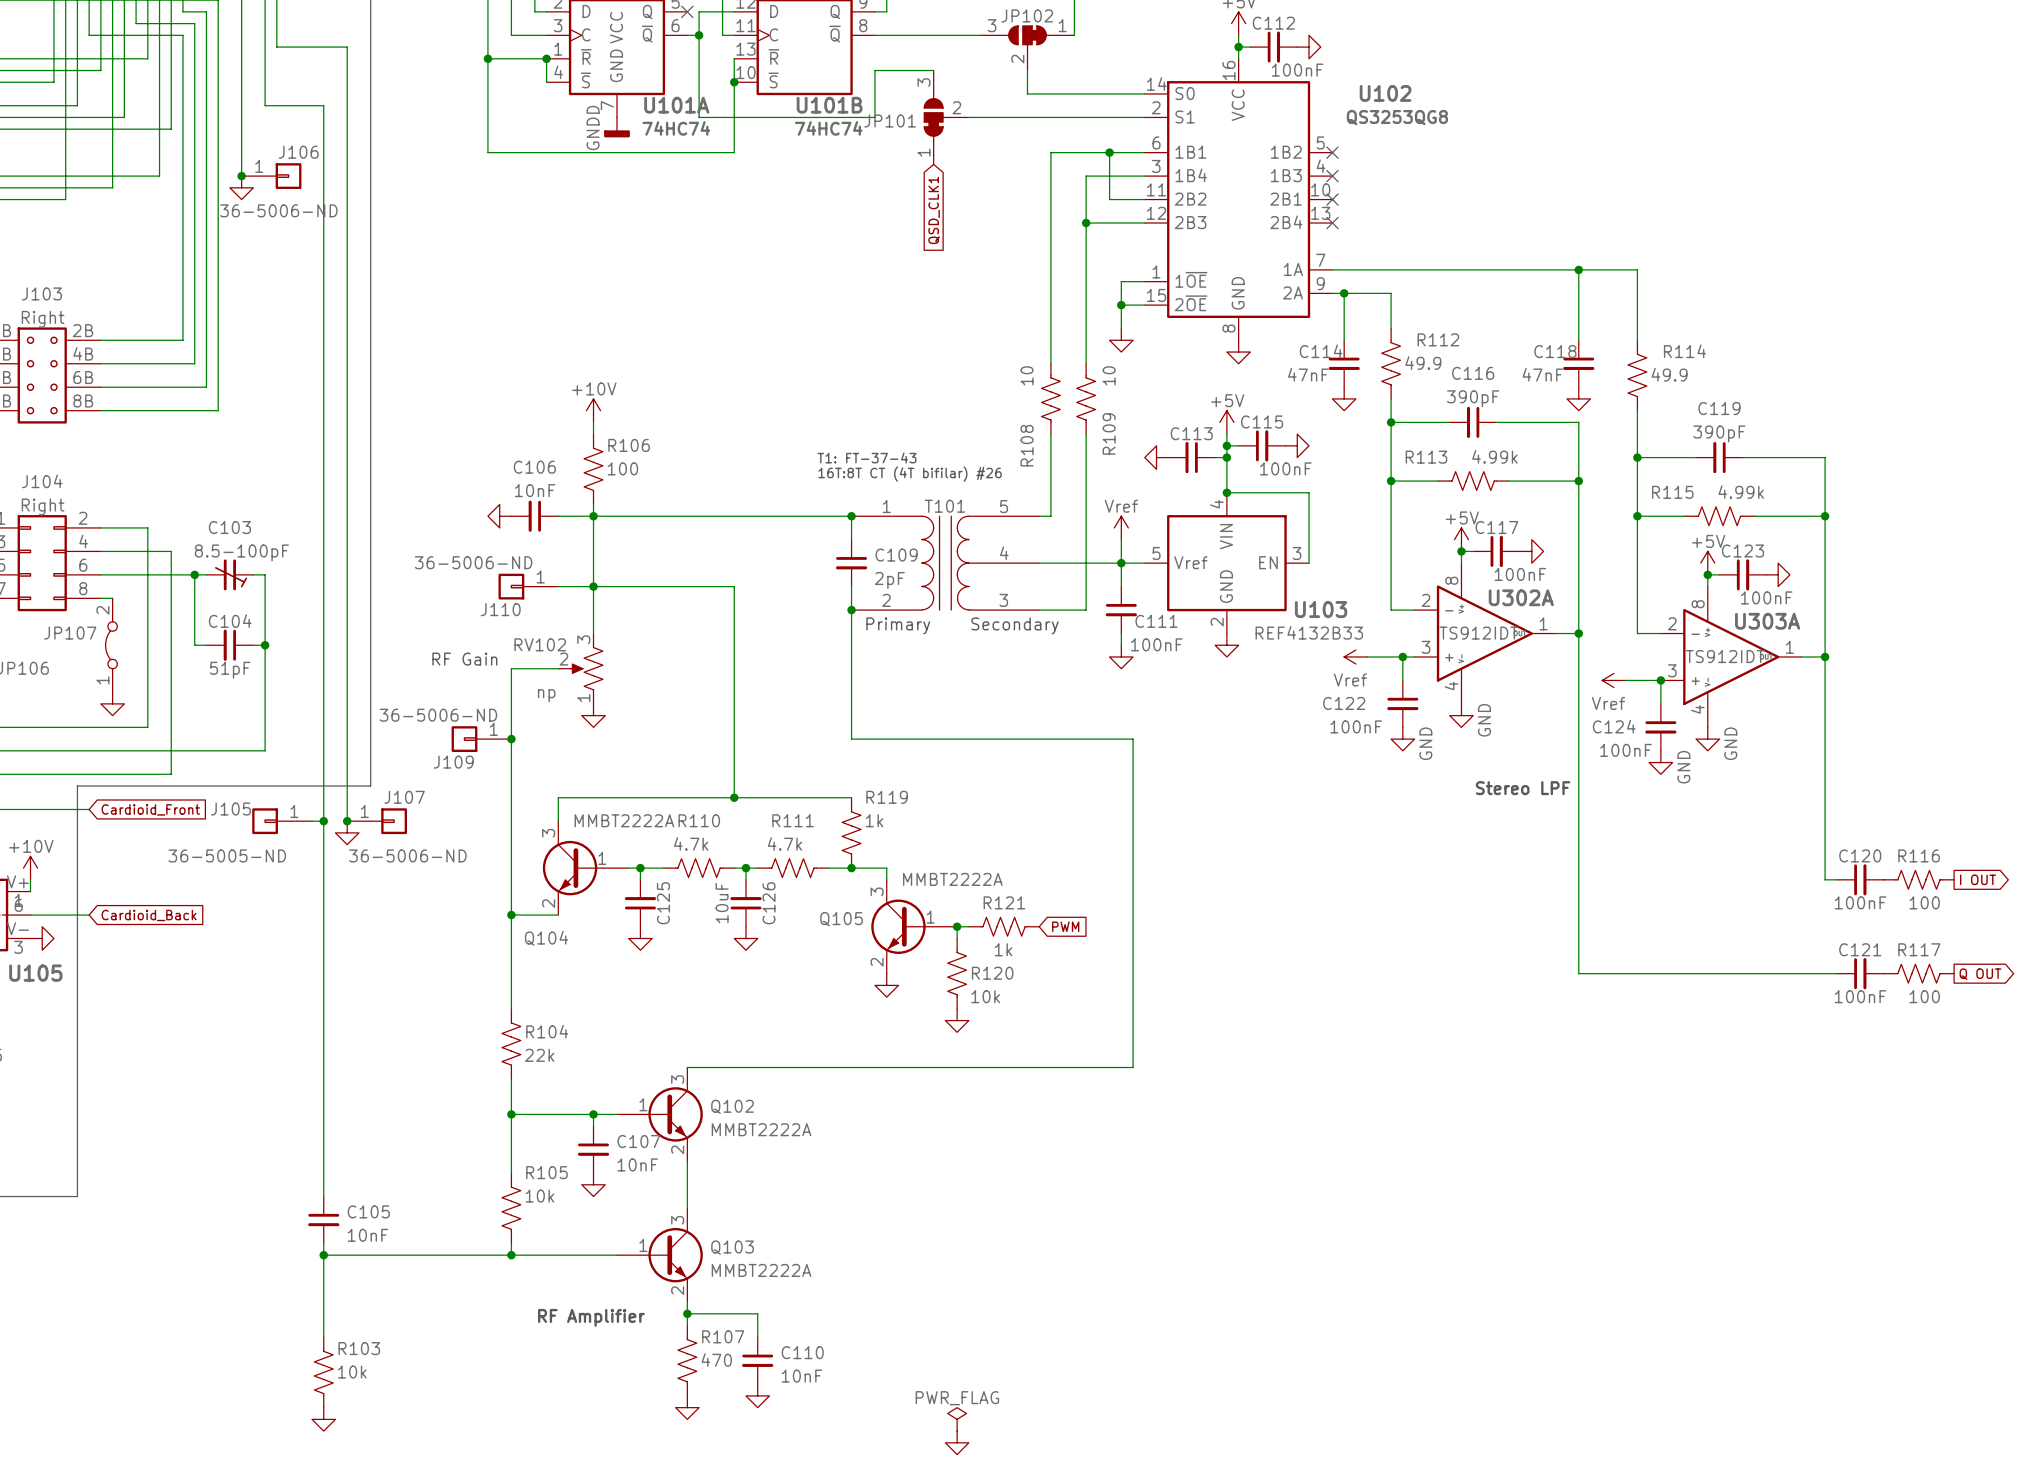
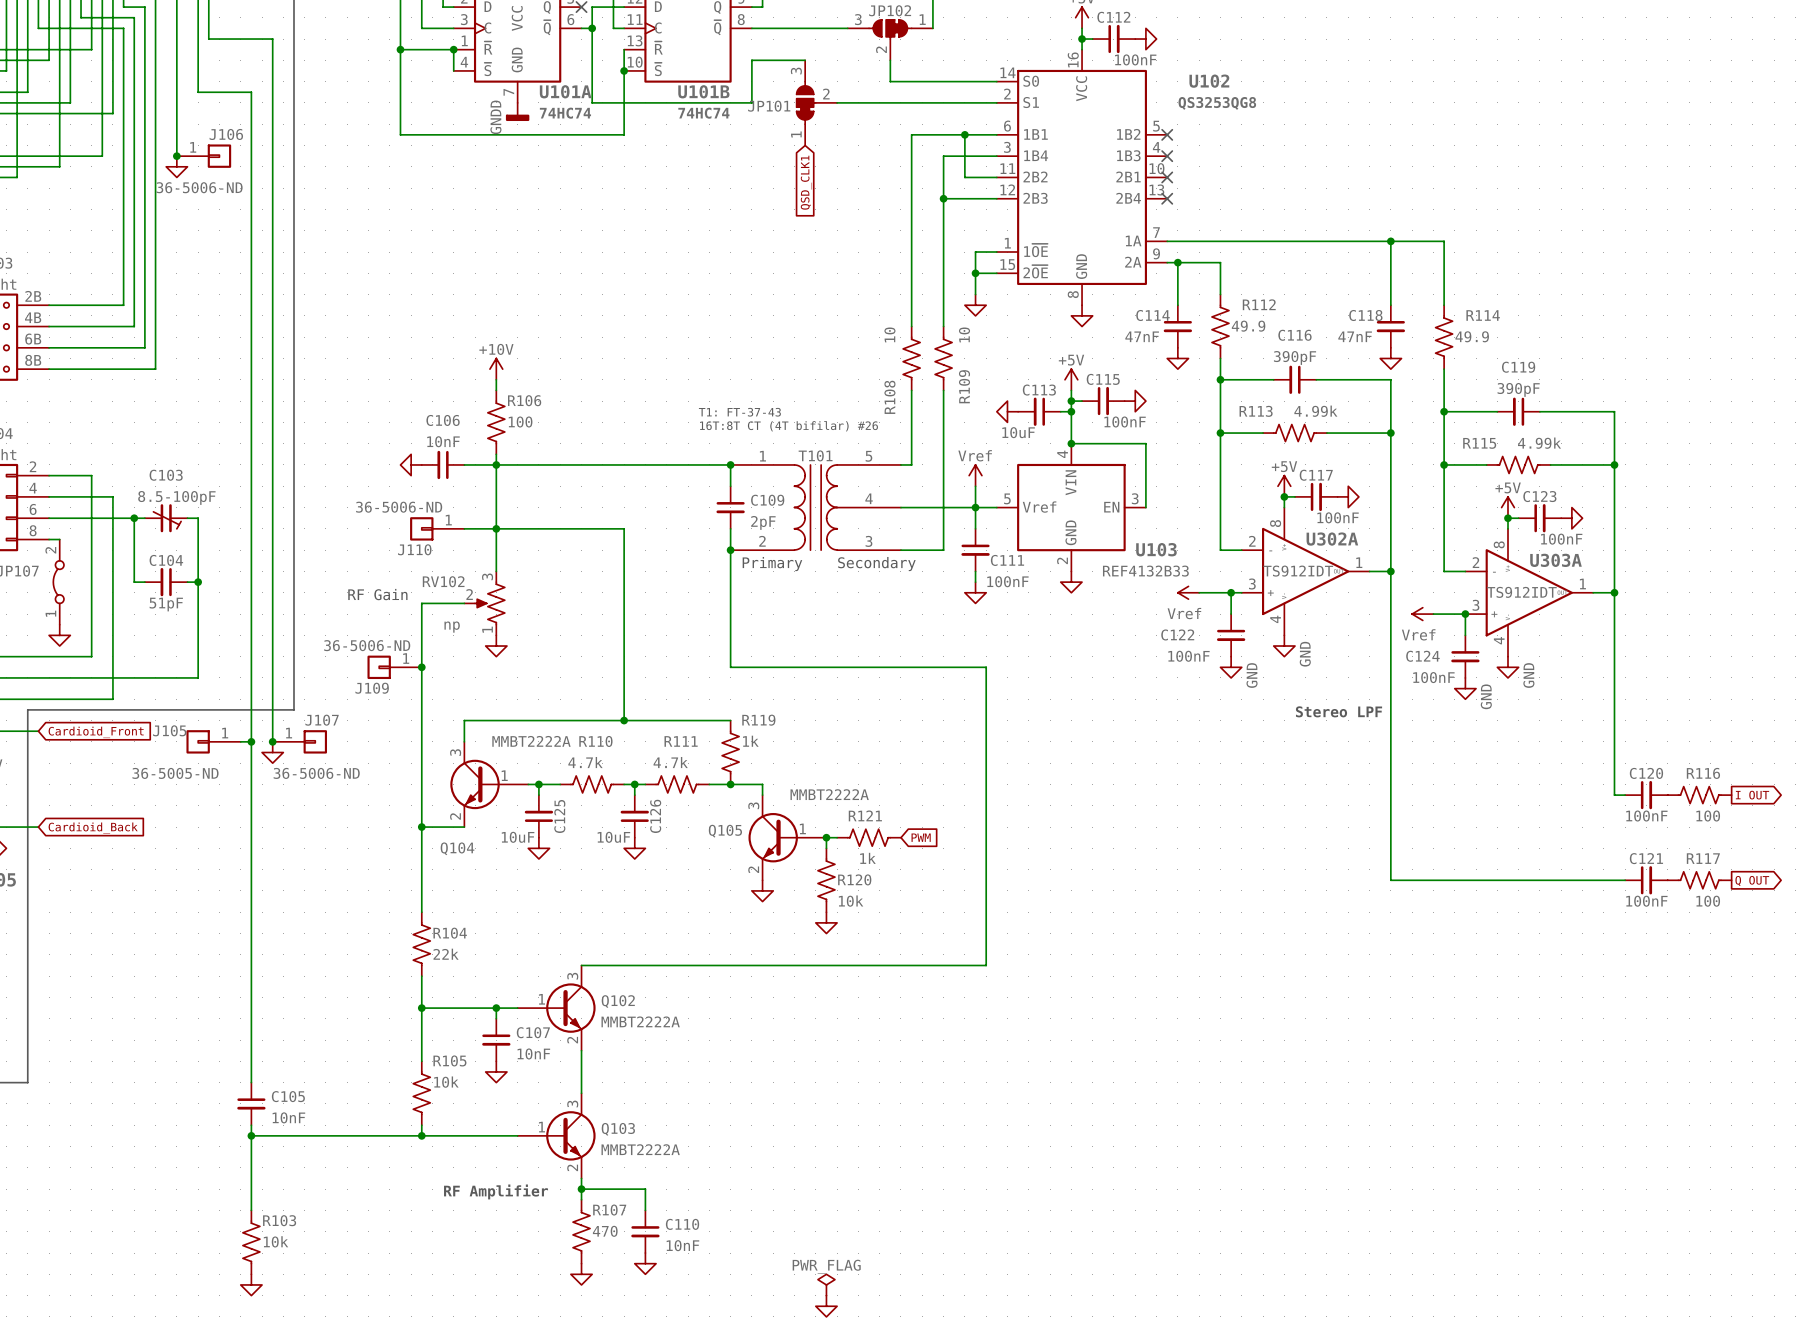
C113 value: none -> 10uF (1018, 432)
C126 value rotation: 0° (722, 903) -> 90° clockwise (613, 837)
C125 value: none -> 10uF (518, 837)

